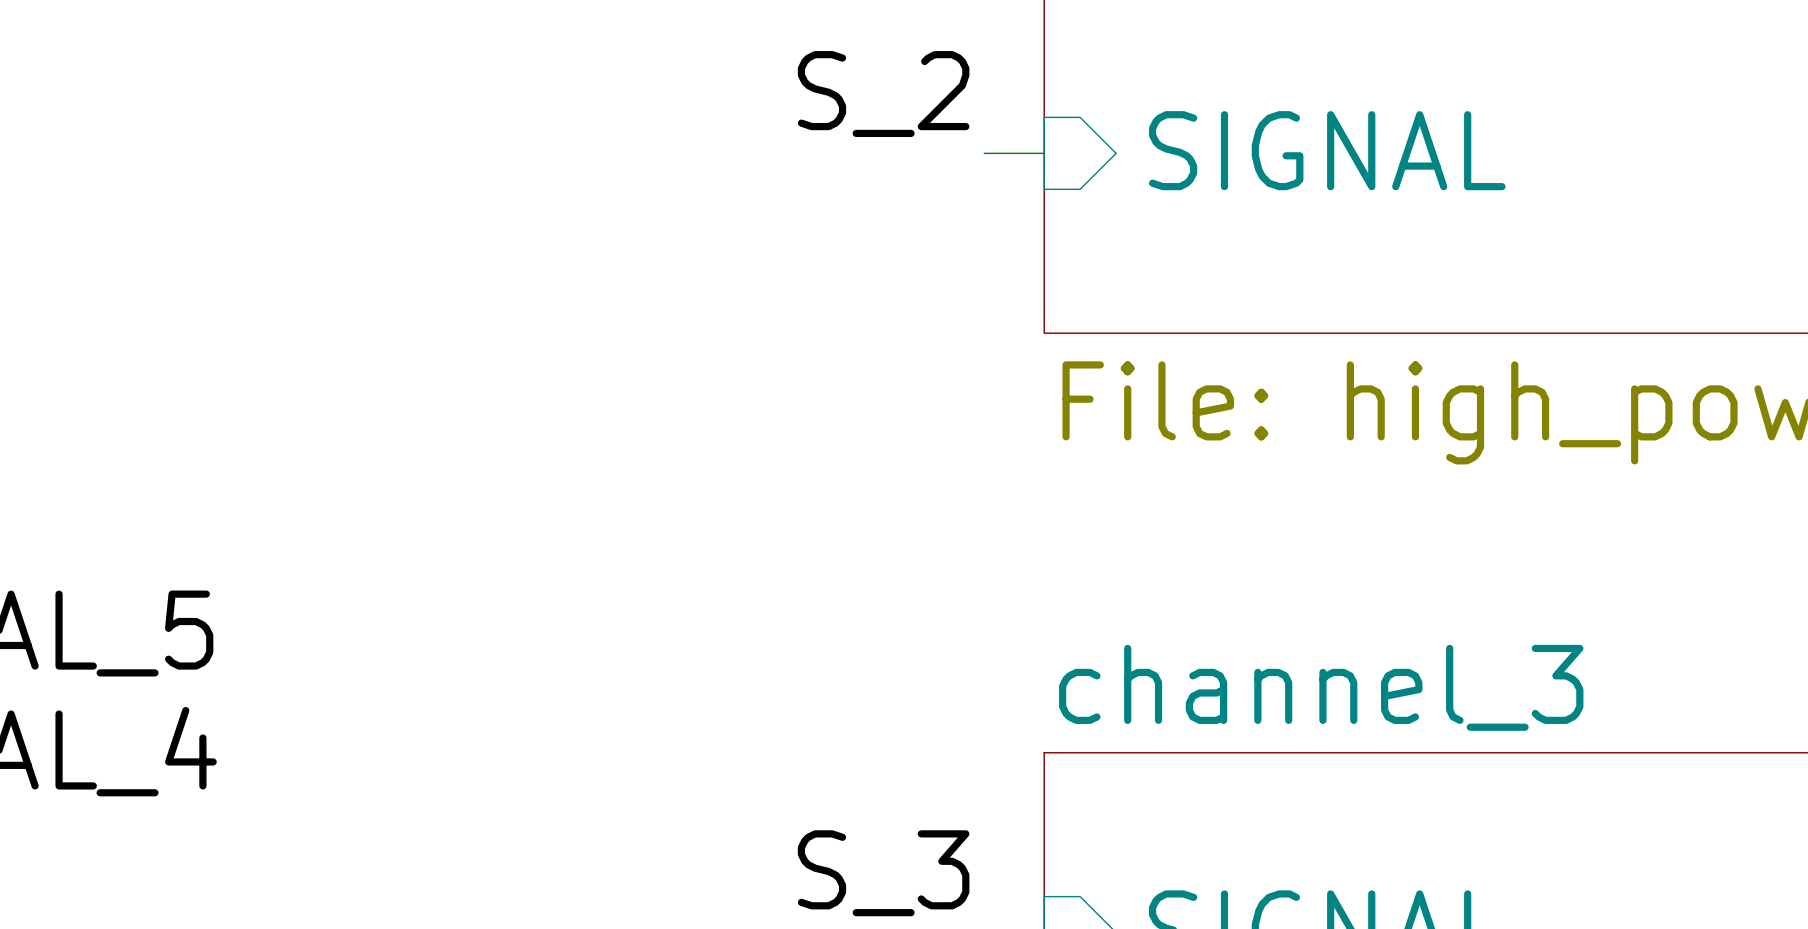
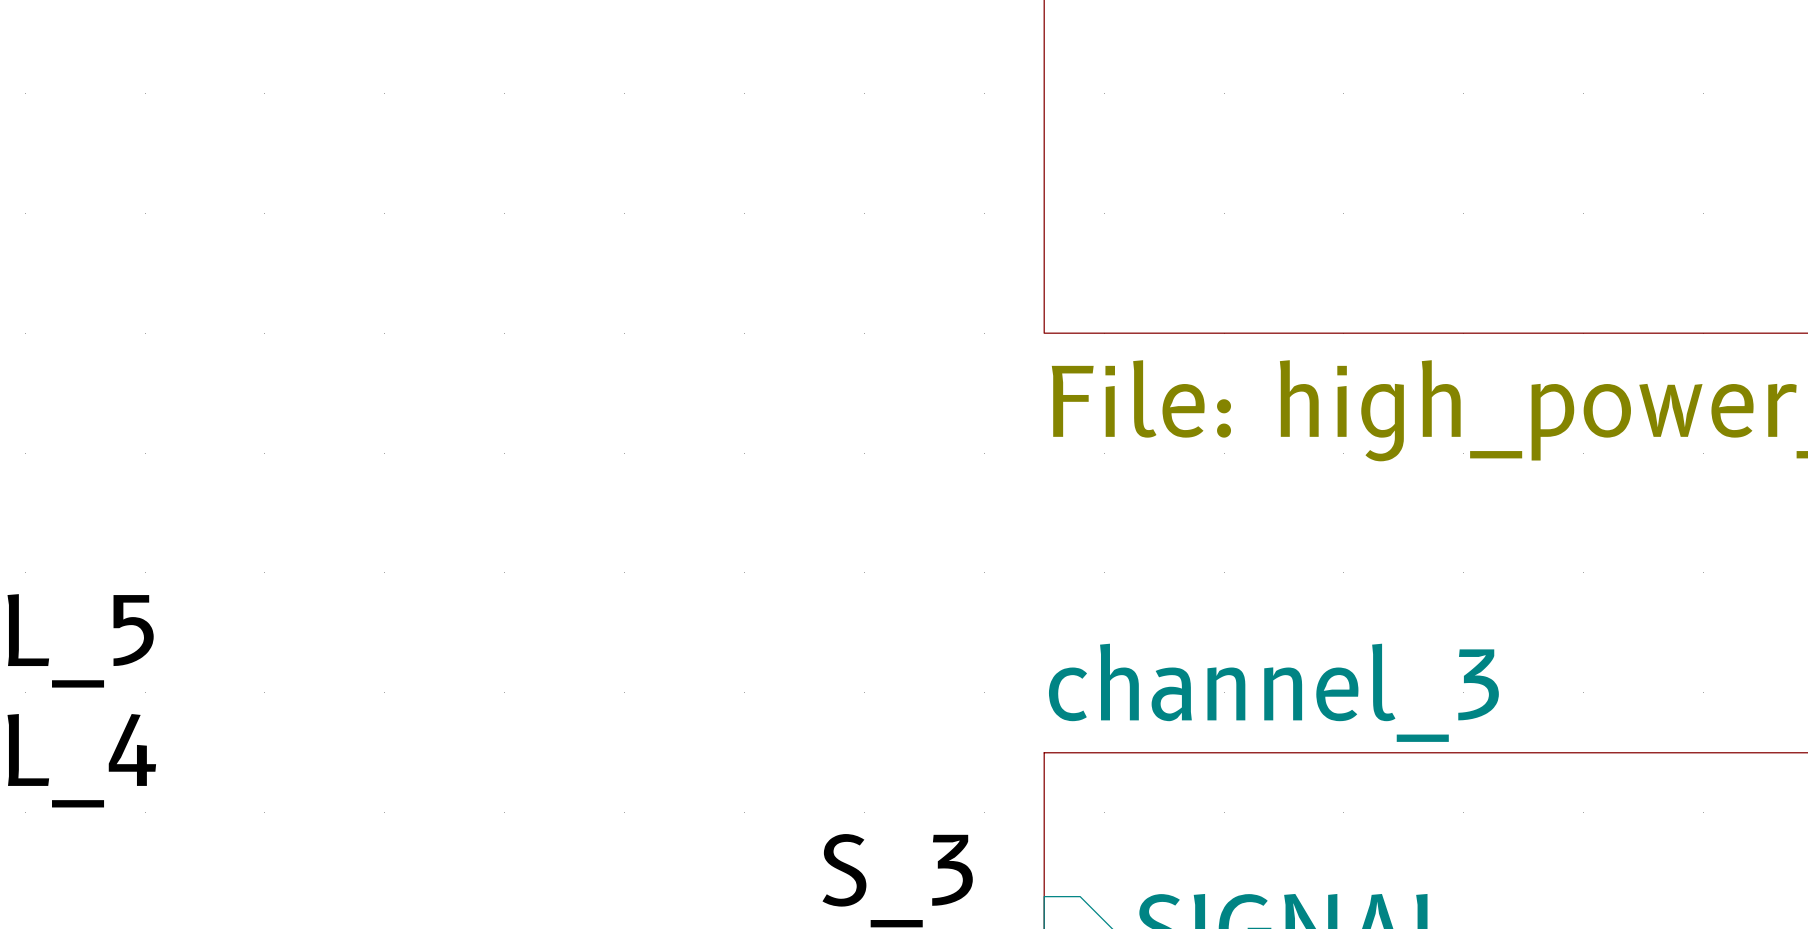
label: S_2 (883, 94) -> none
sheet pin: SIGNAL (1327, 150) -> none
wire: (984, 153) (1044, 153) -> none

